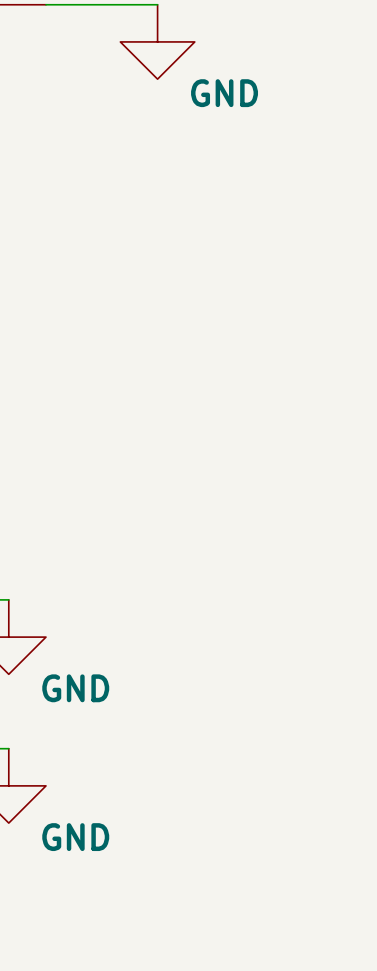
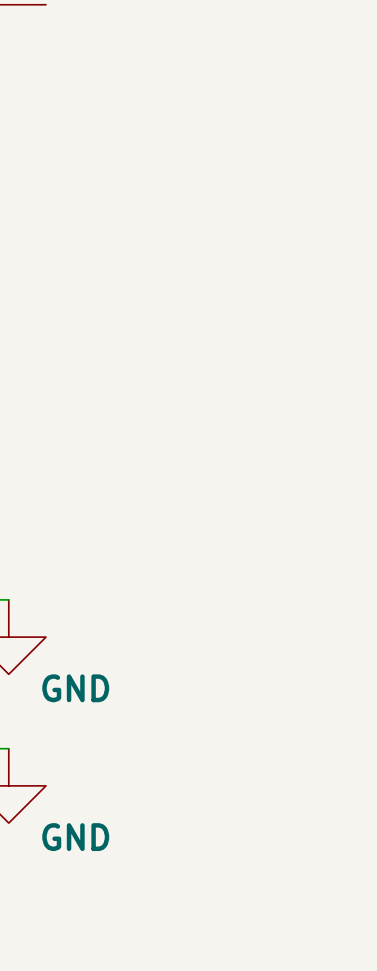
wire: (45, 4) (157, 4) -> none
power symbol: GND (157, 41) -> none

